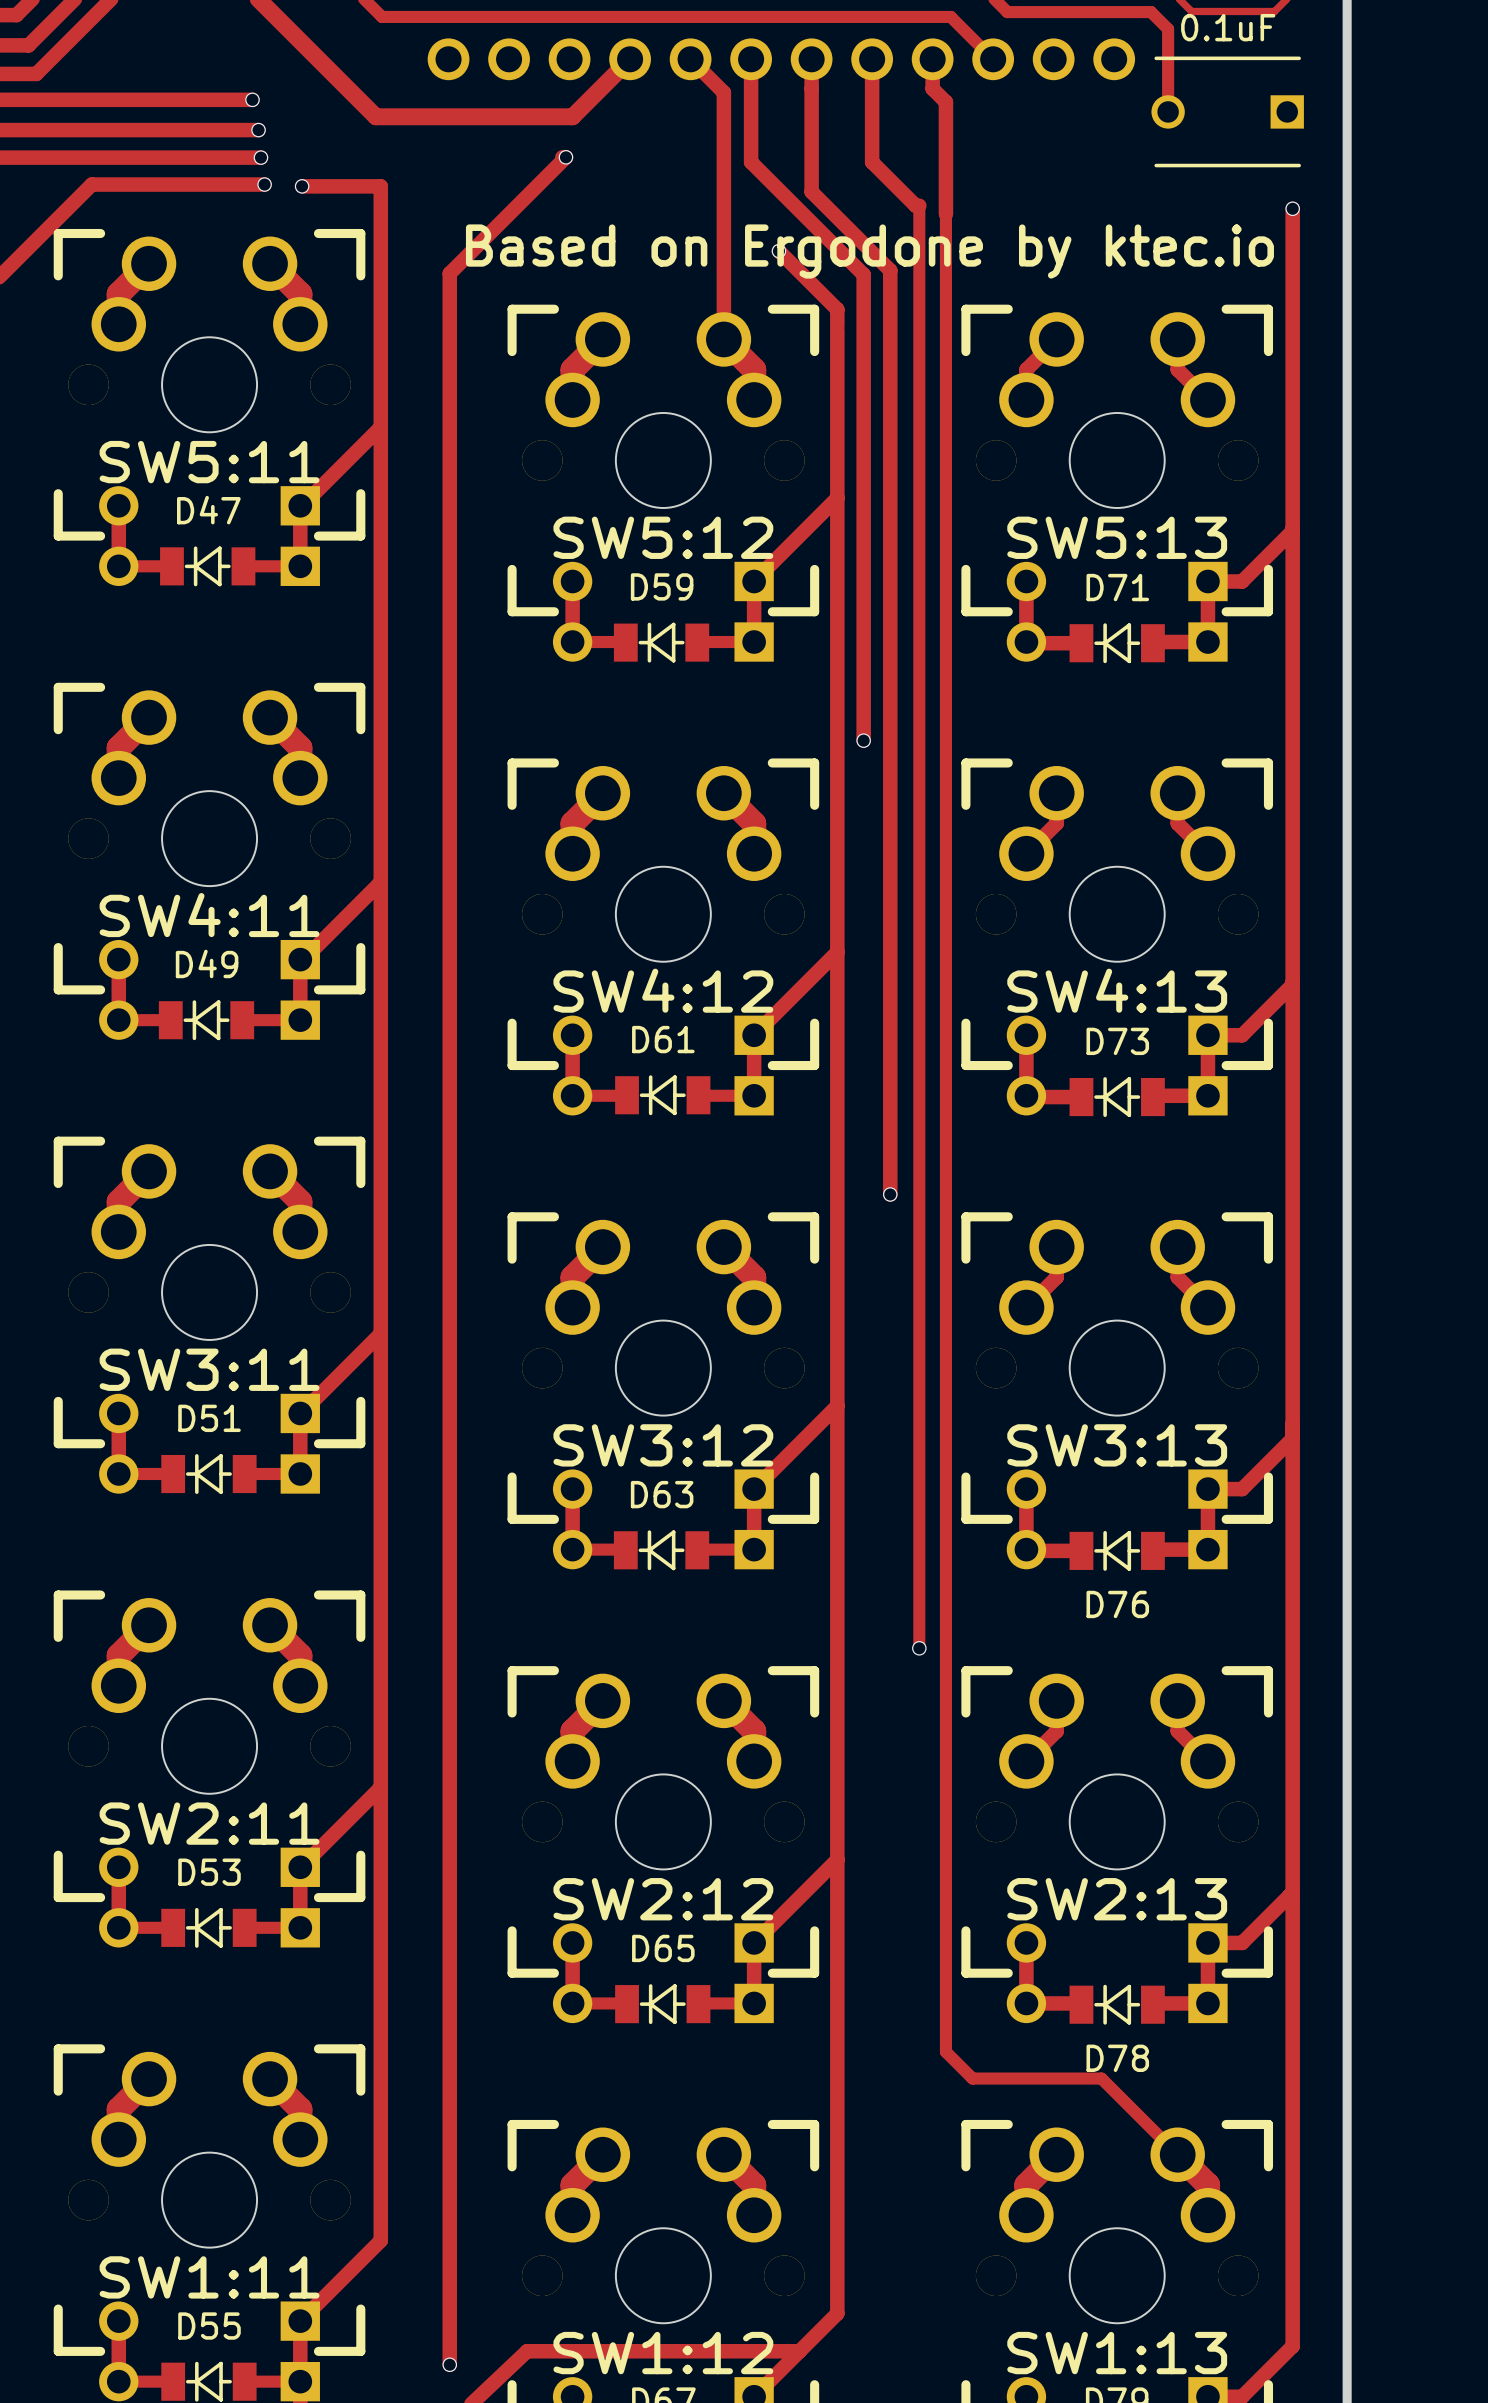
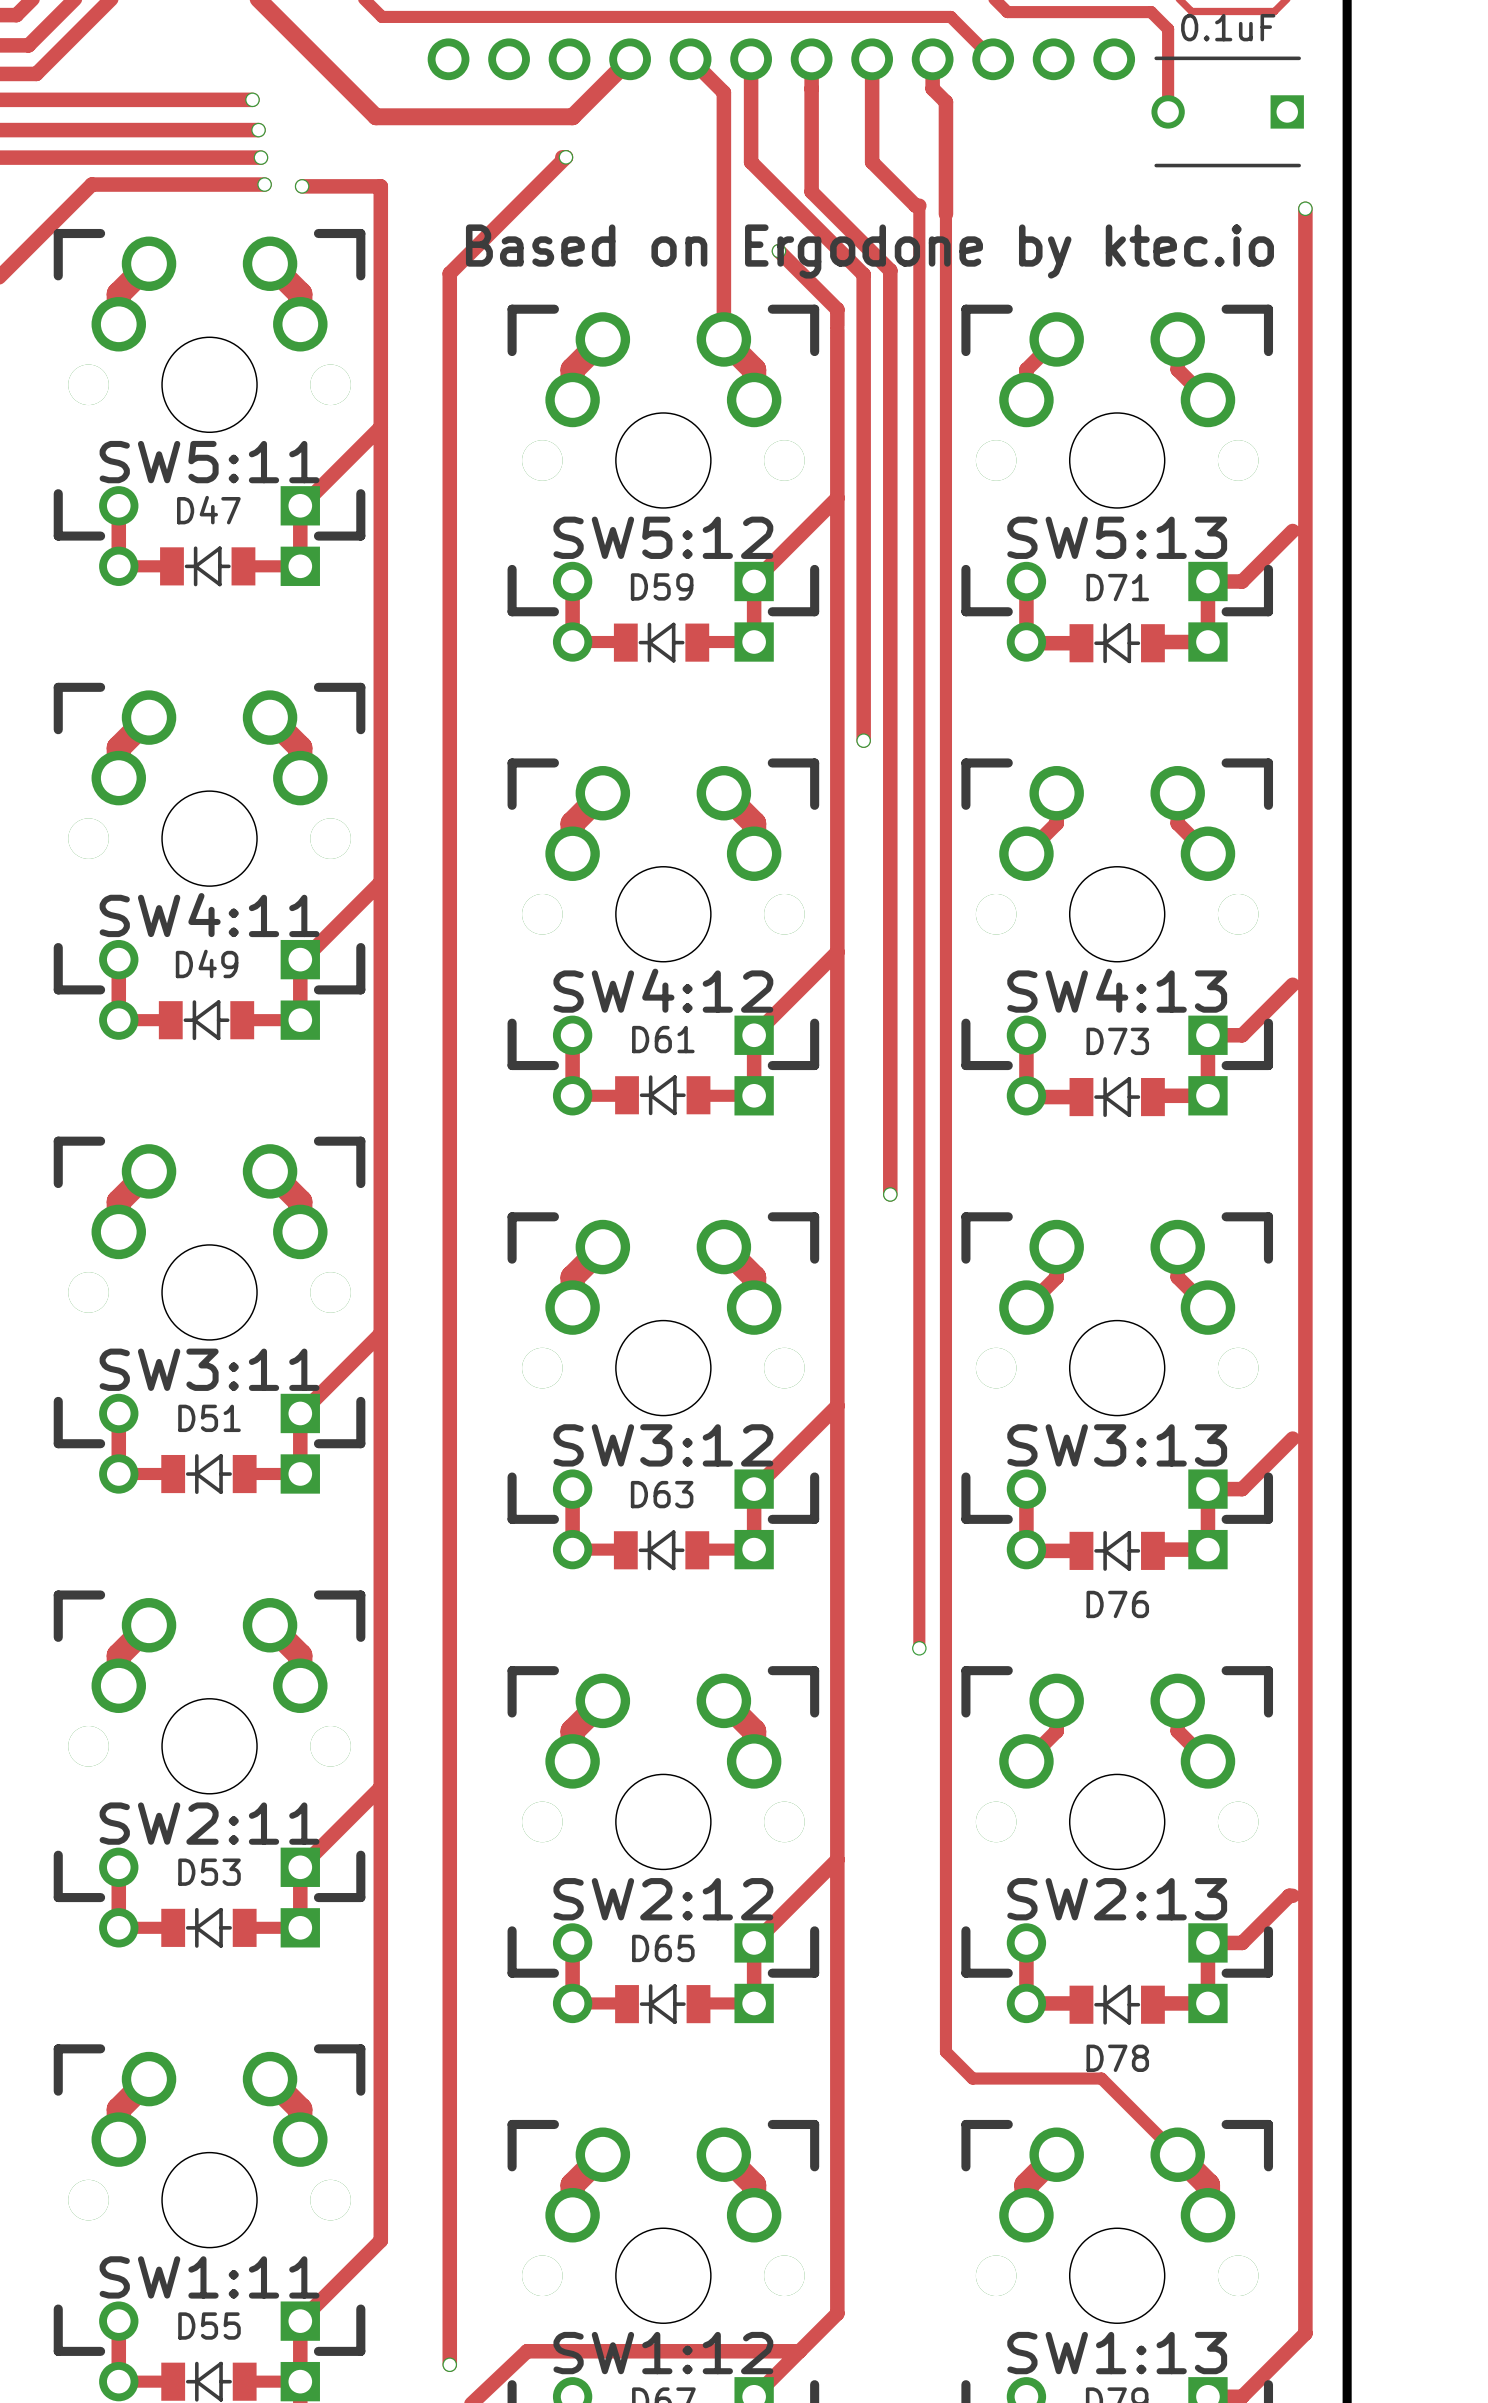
track: (1292, 208) (1292, 2346) -> (1305, 208) (1305, 2333) (1292, 2346)
via position: (1292, 208) -> (1305, 208)

